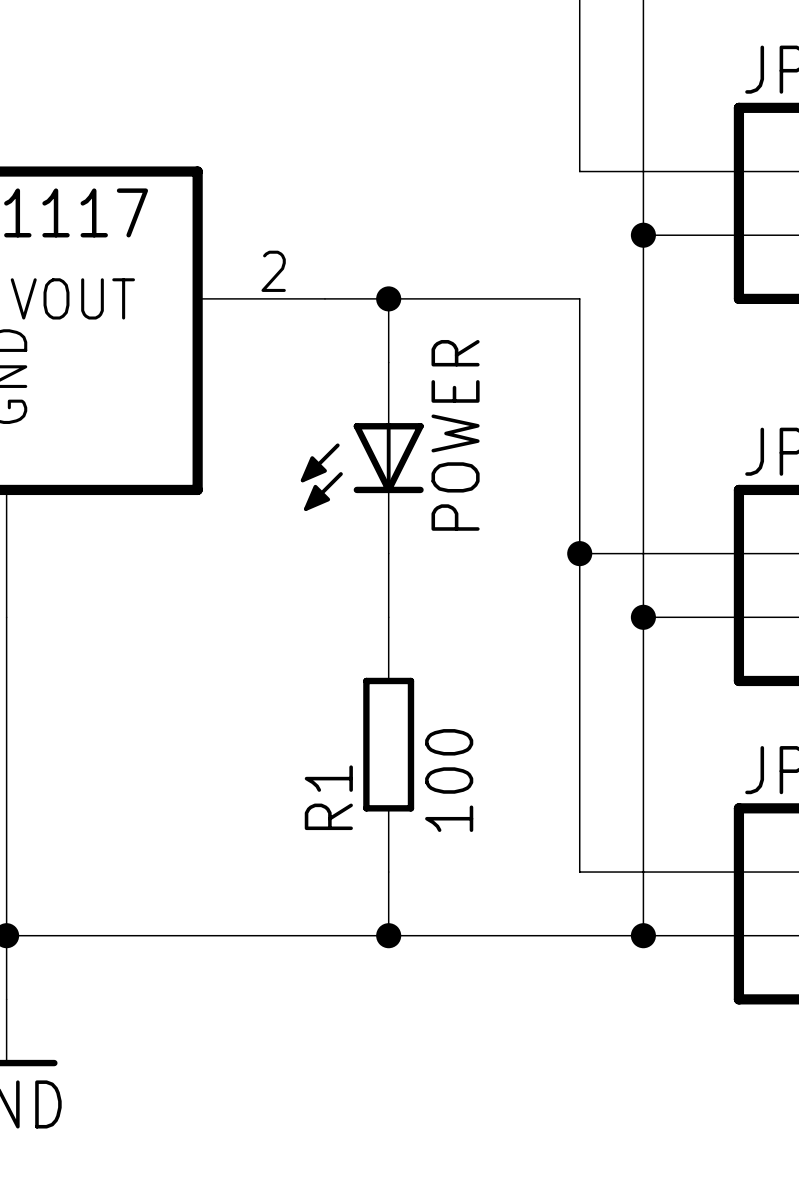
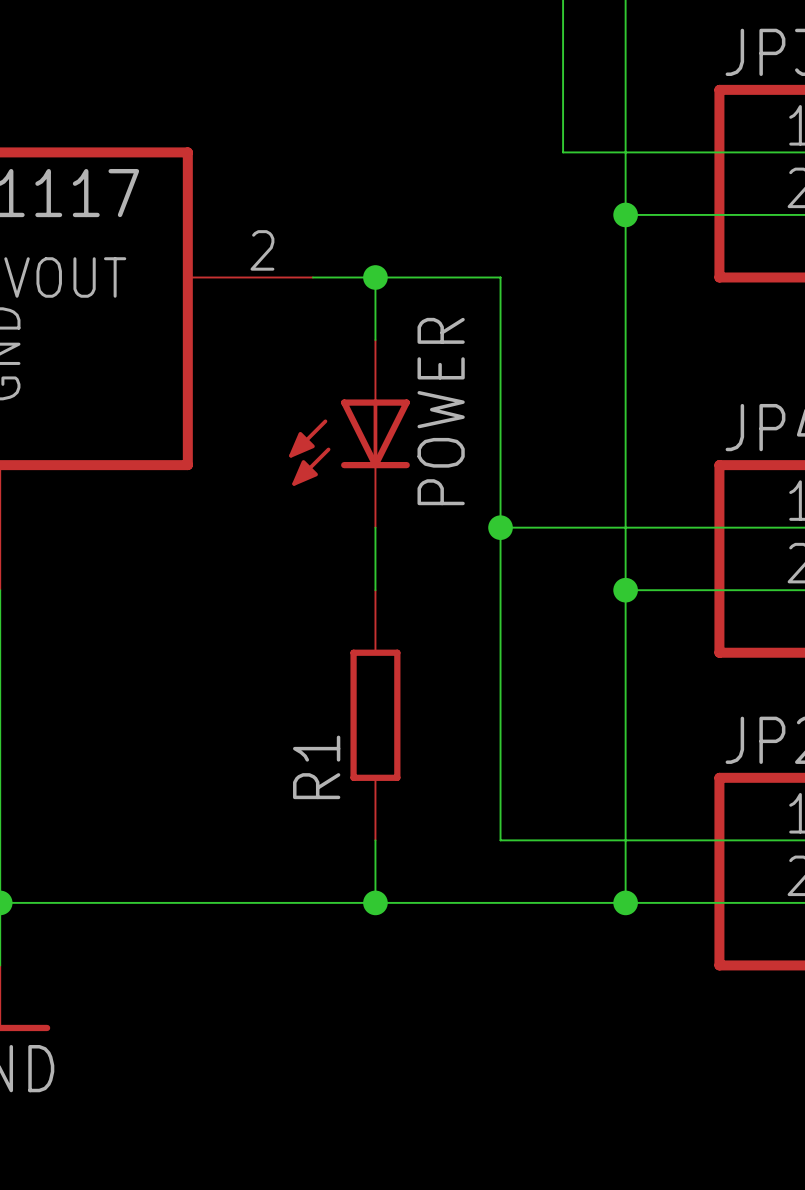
wire: (516, 298) (579, 298) (579, 872) -> (500, 277) (500, 840) (563, 840)
wire: none -> (500, 527) (563, 527)
junction position: (579, 553) -> (500, 527)
R1 value: 100 (449, 780) -> none

